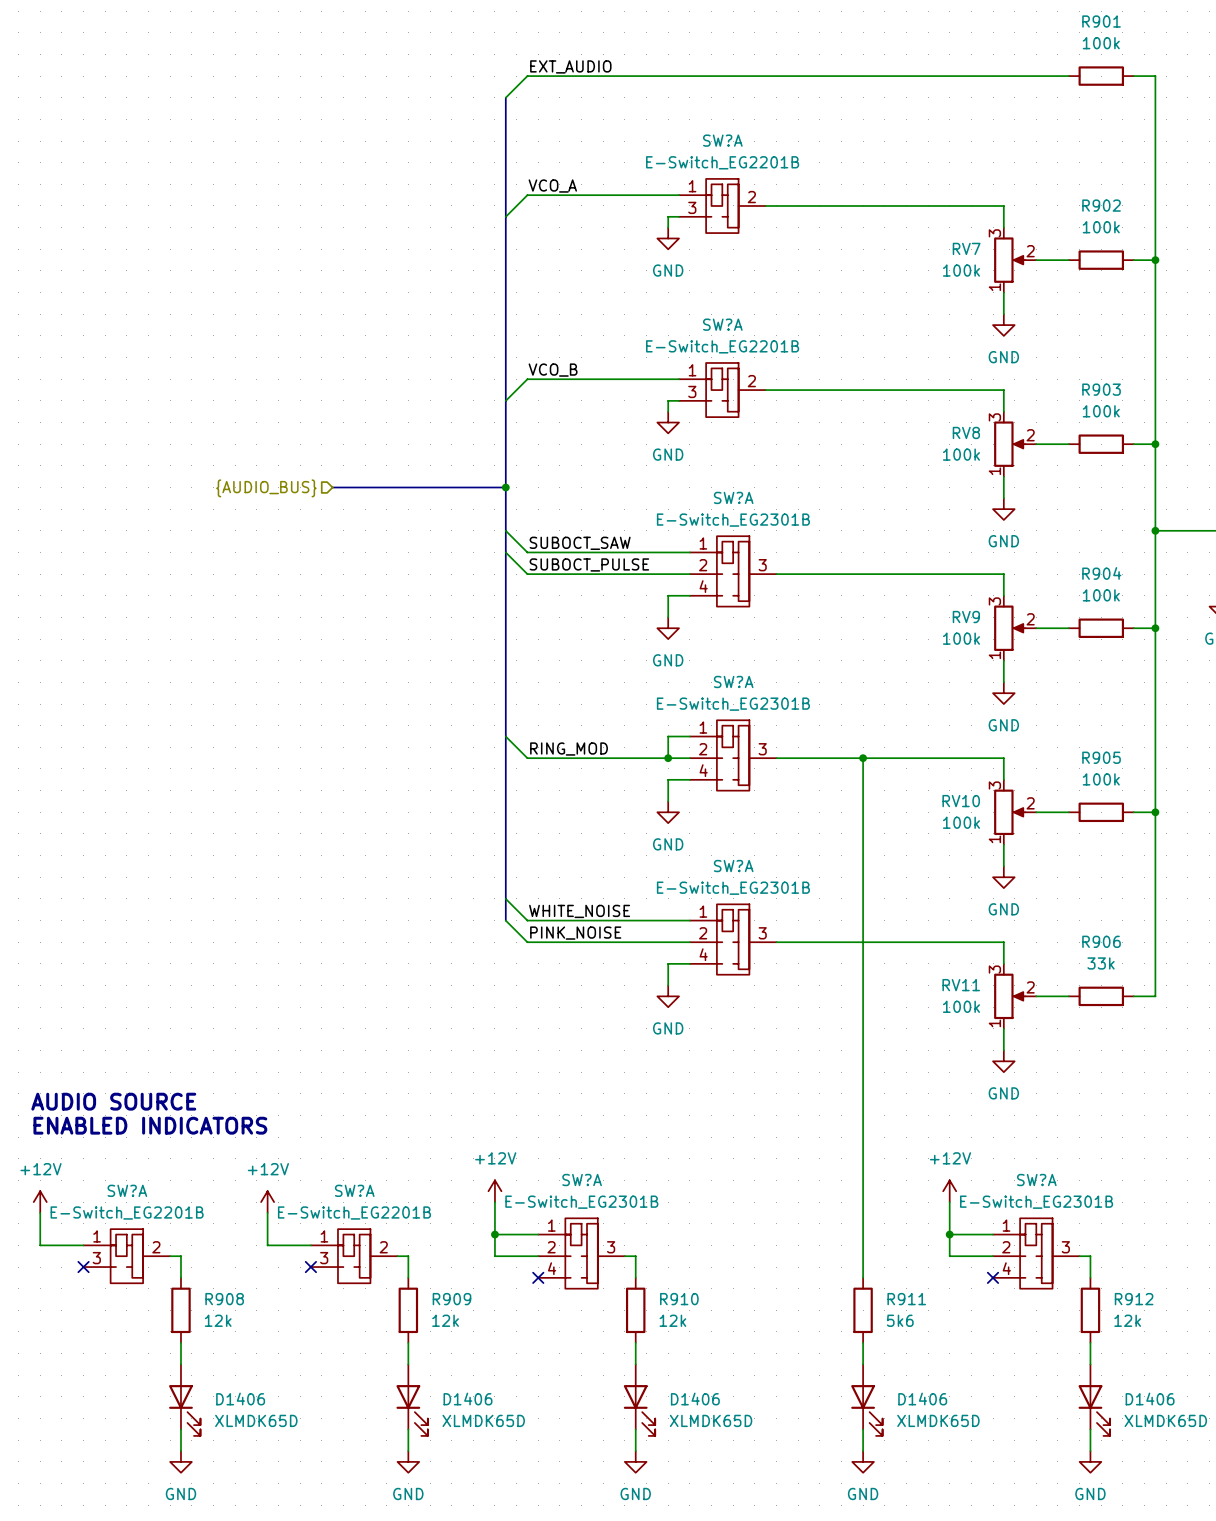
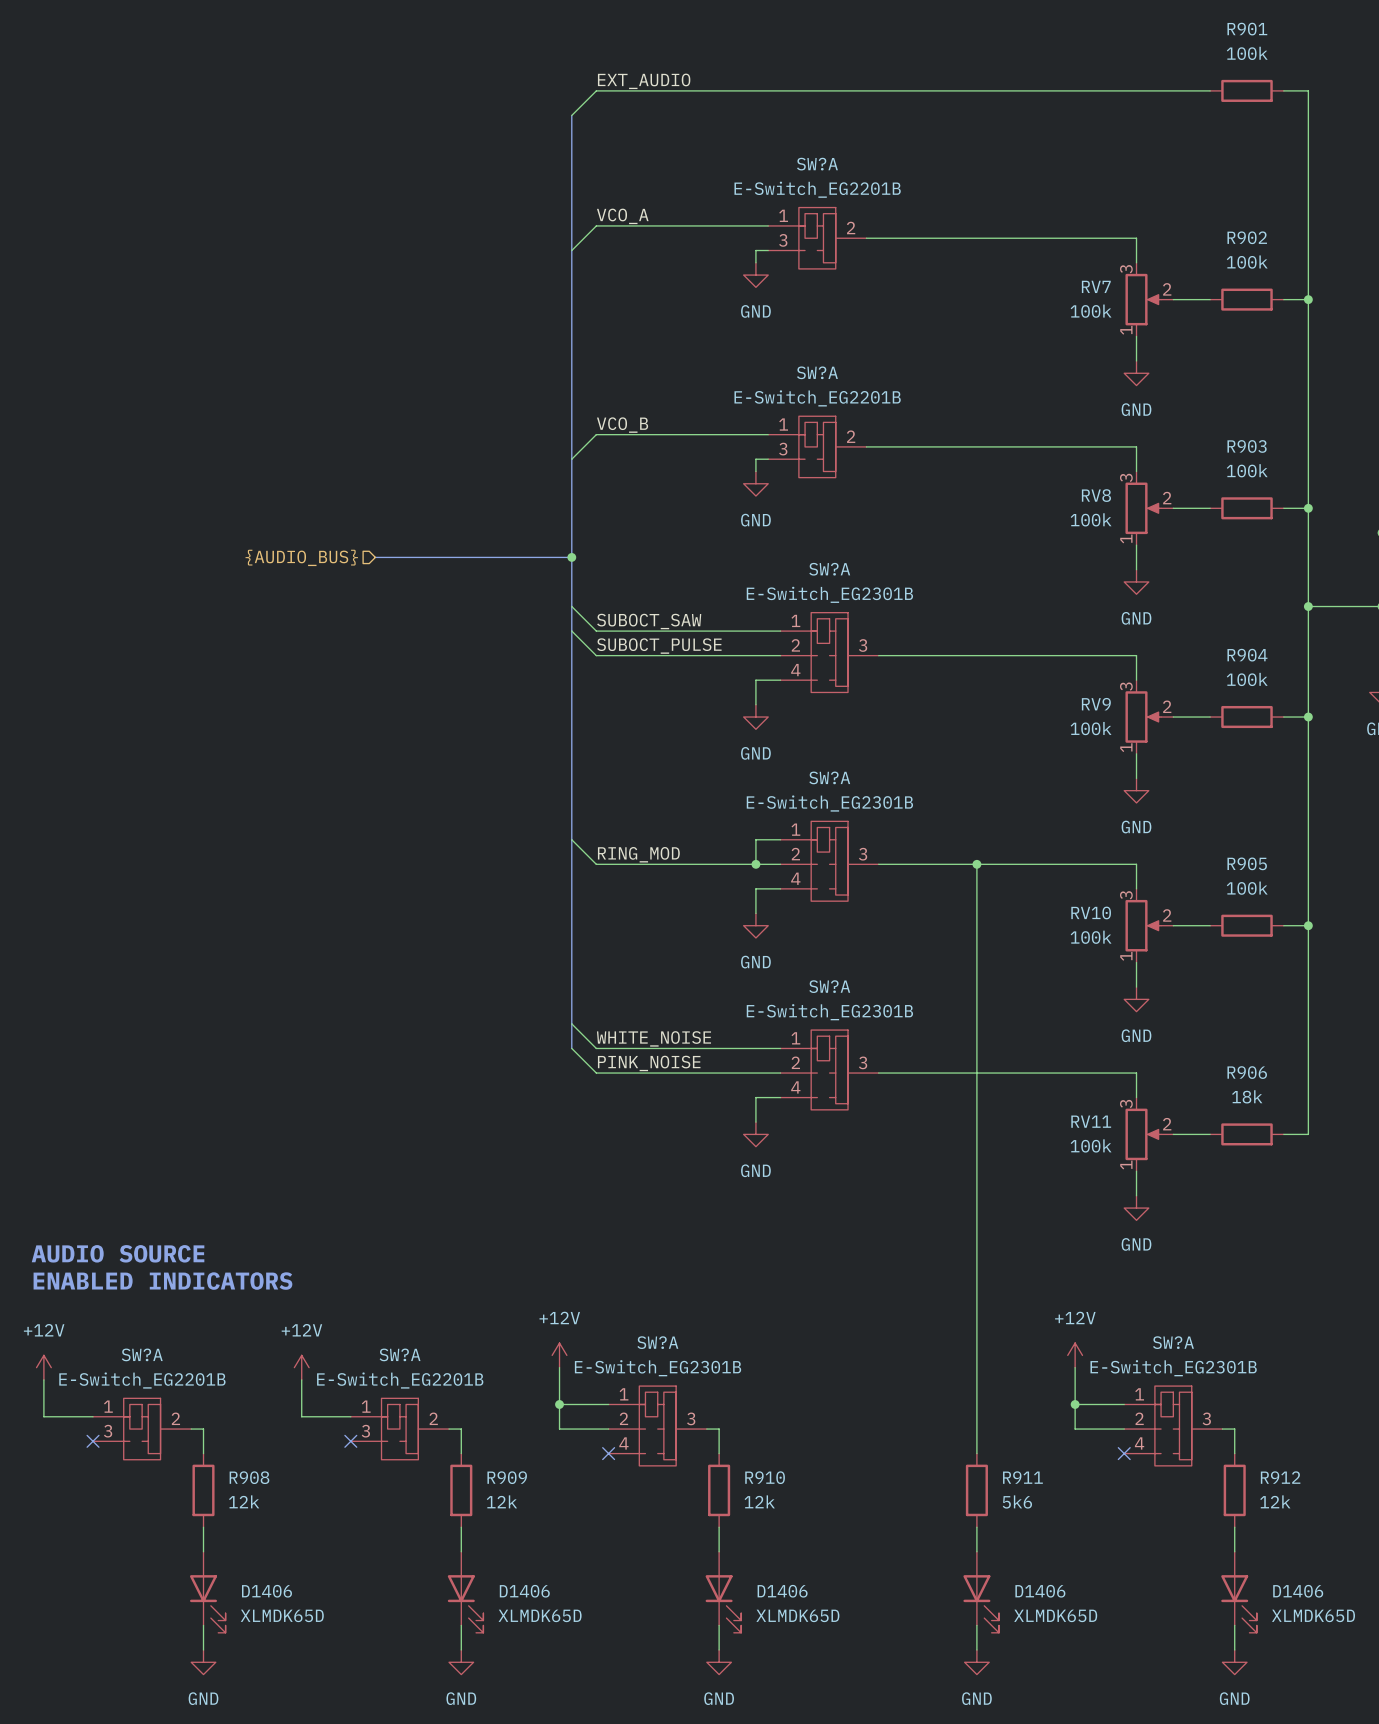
R906 value: 33k (1101, 963) -> 18k (1247, 1096)

